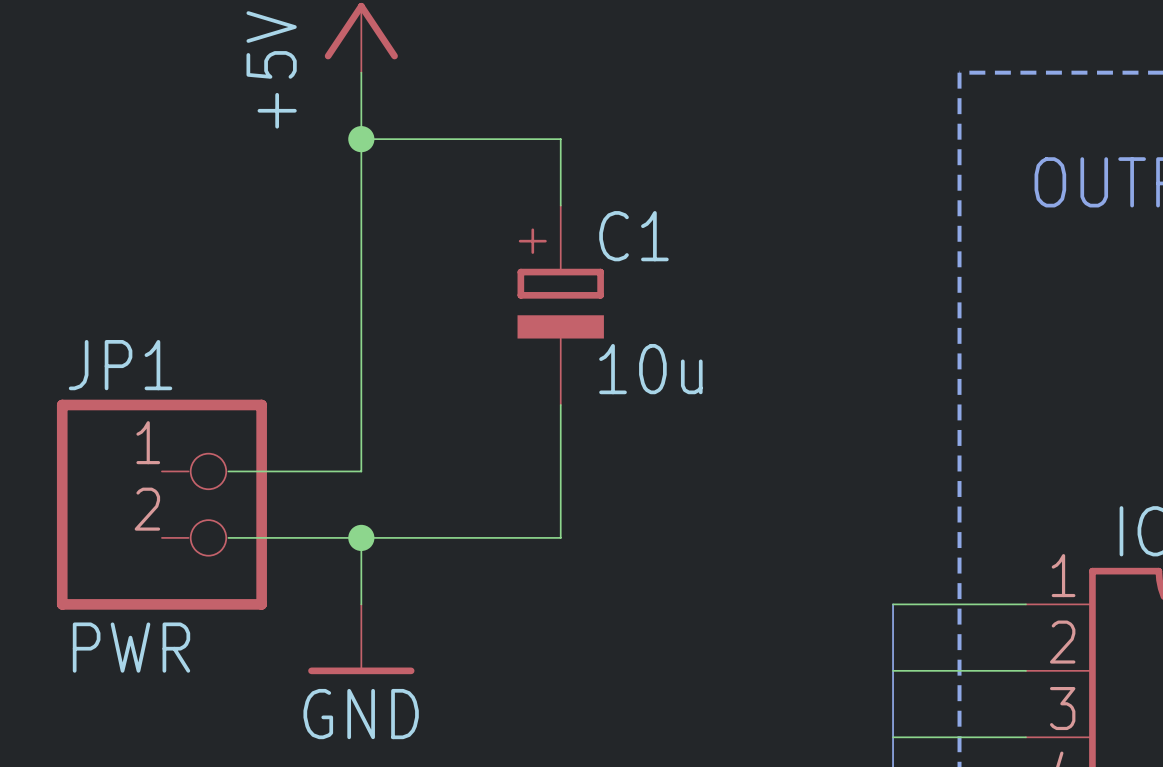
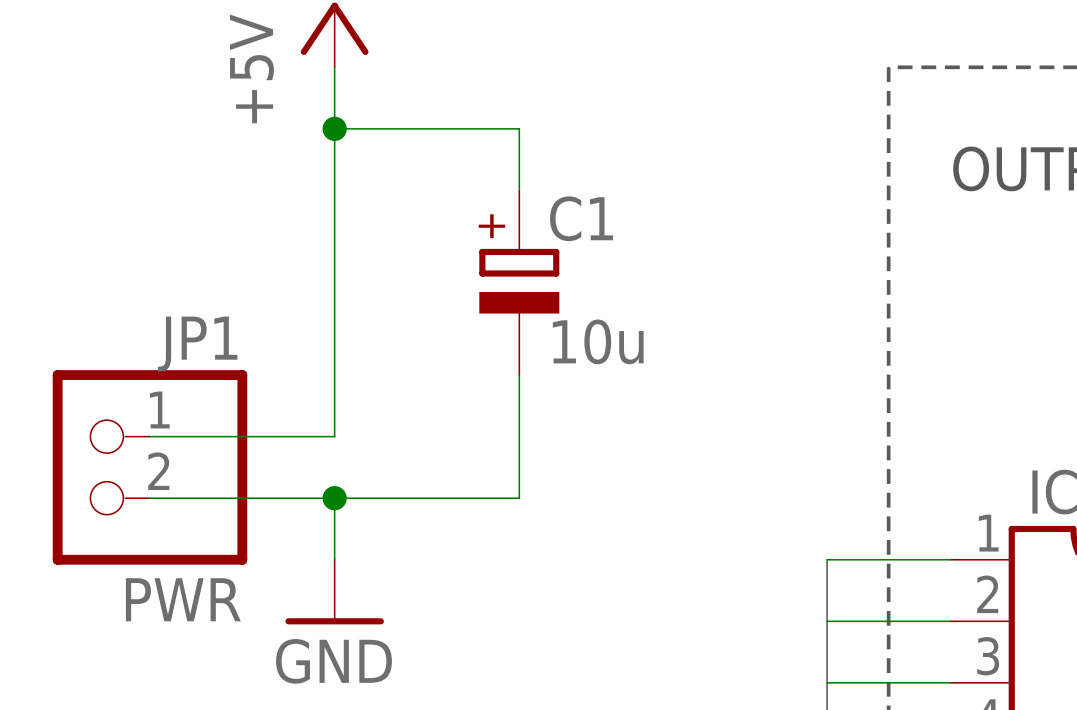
wire: none -> (149, 436) (211, 436)
JP1 flip: as is (161, 504) -> left-right (149, 467)
wire: none -> (149, 498) (211, 498)

